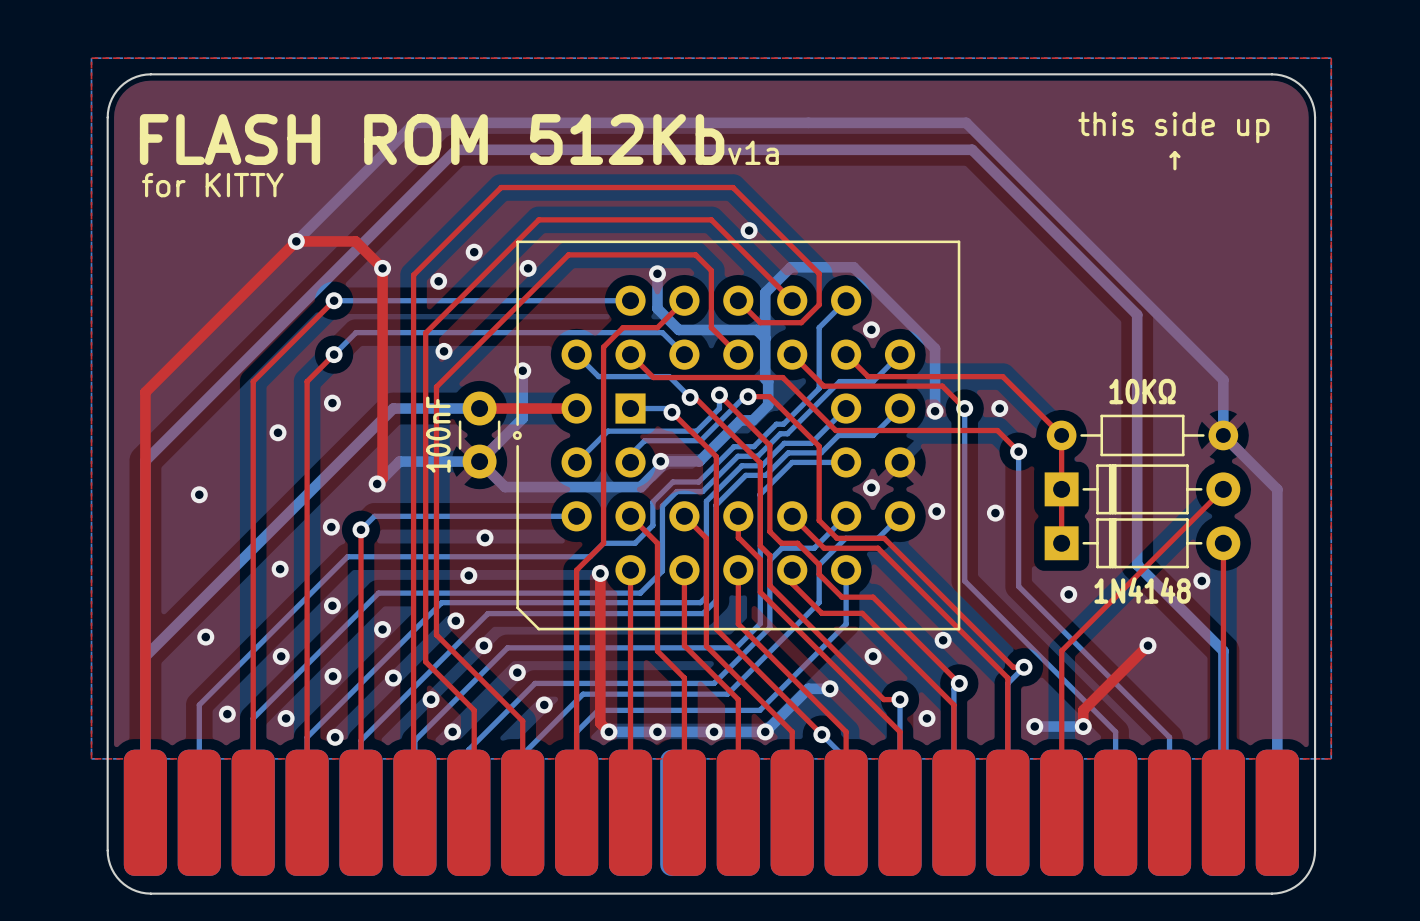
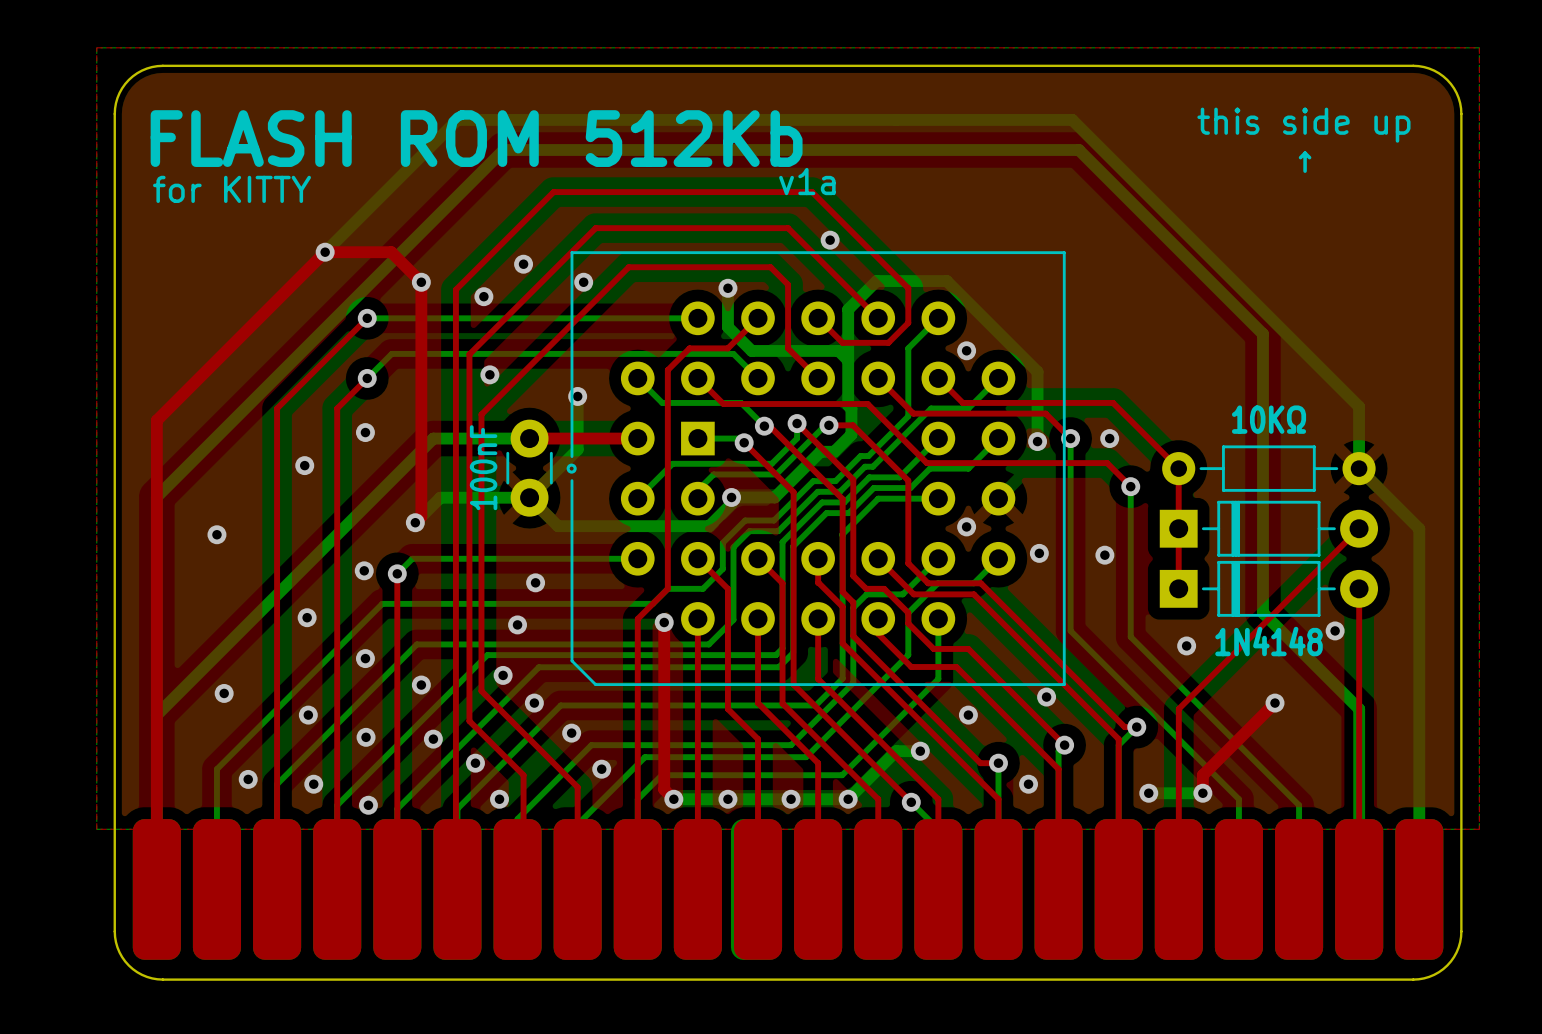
text position: v1a (753, 152) -> v1a (807, 181)

